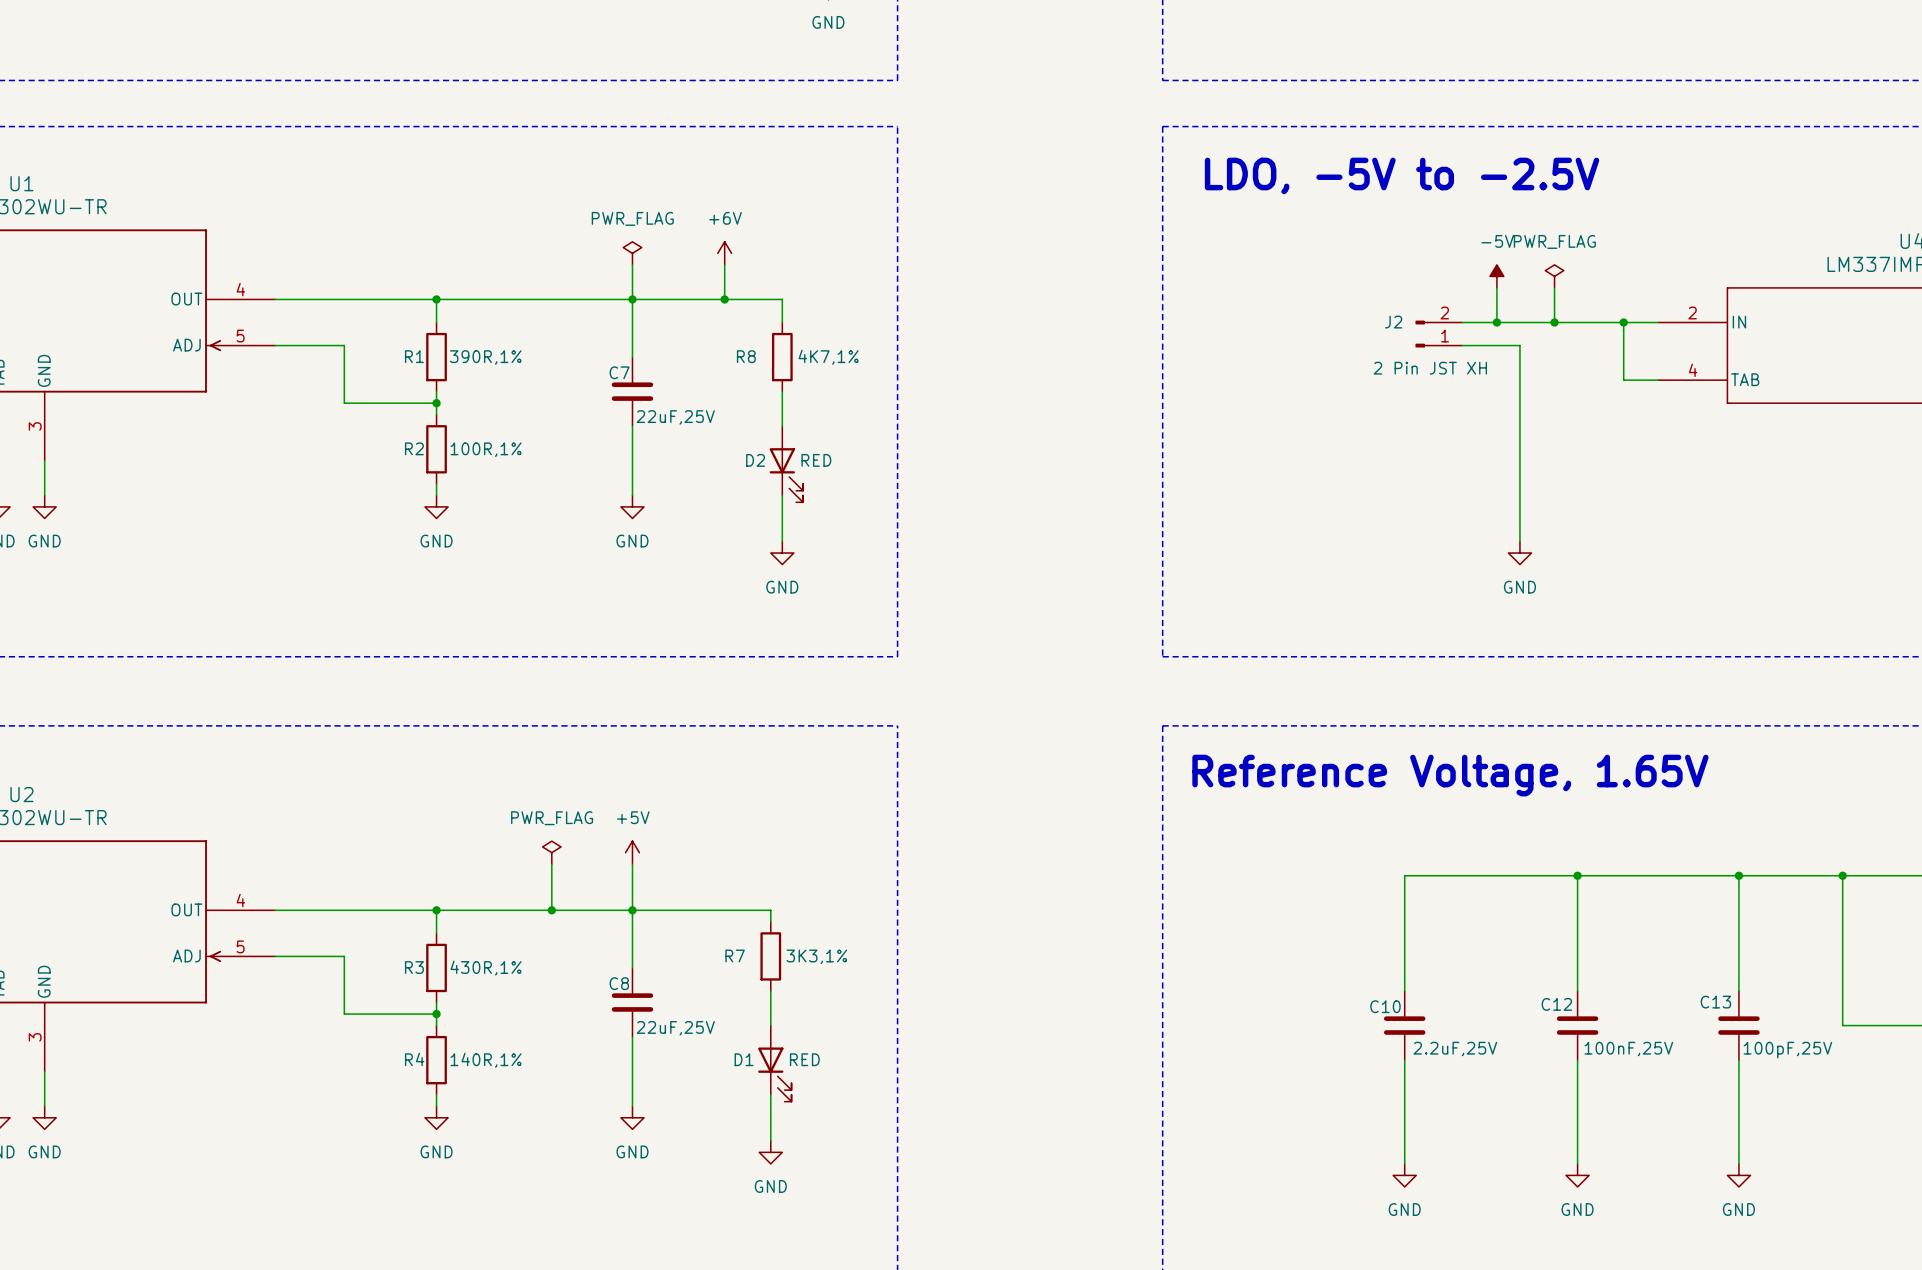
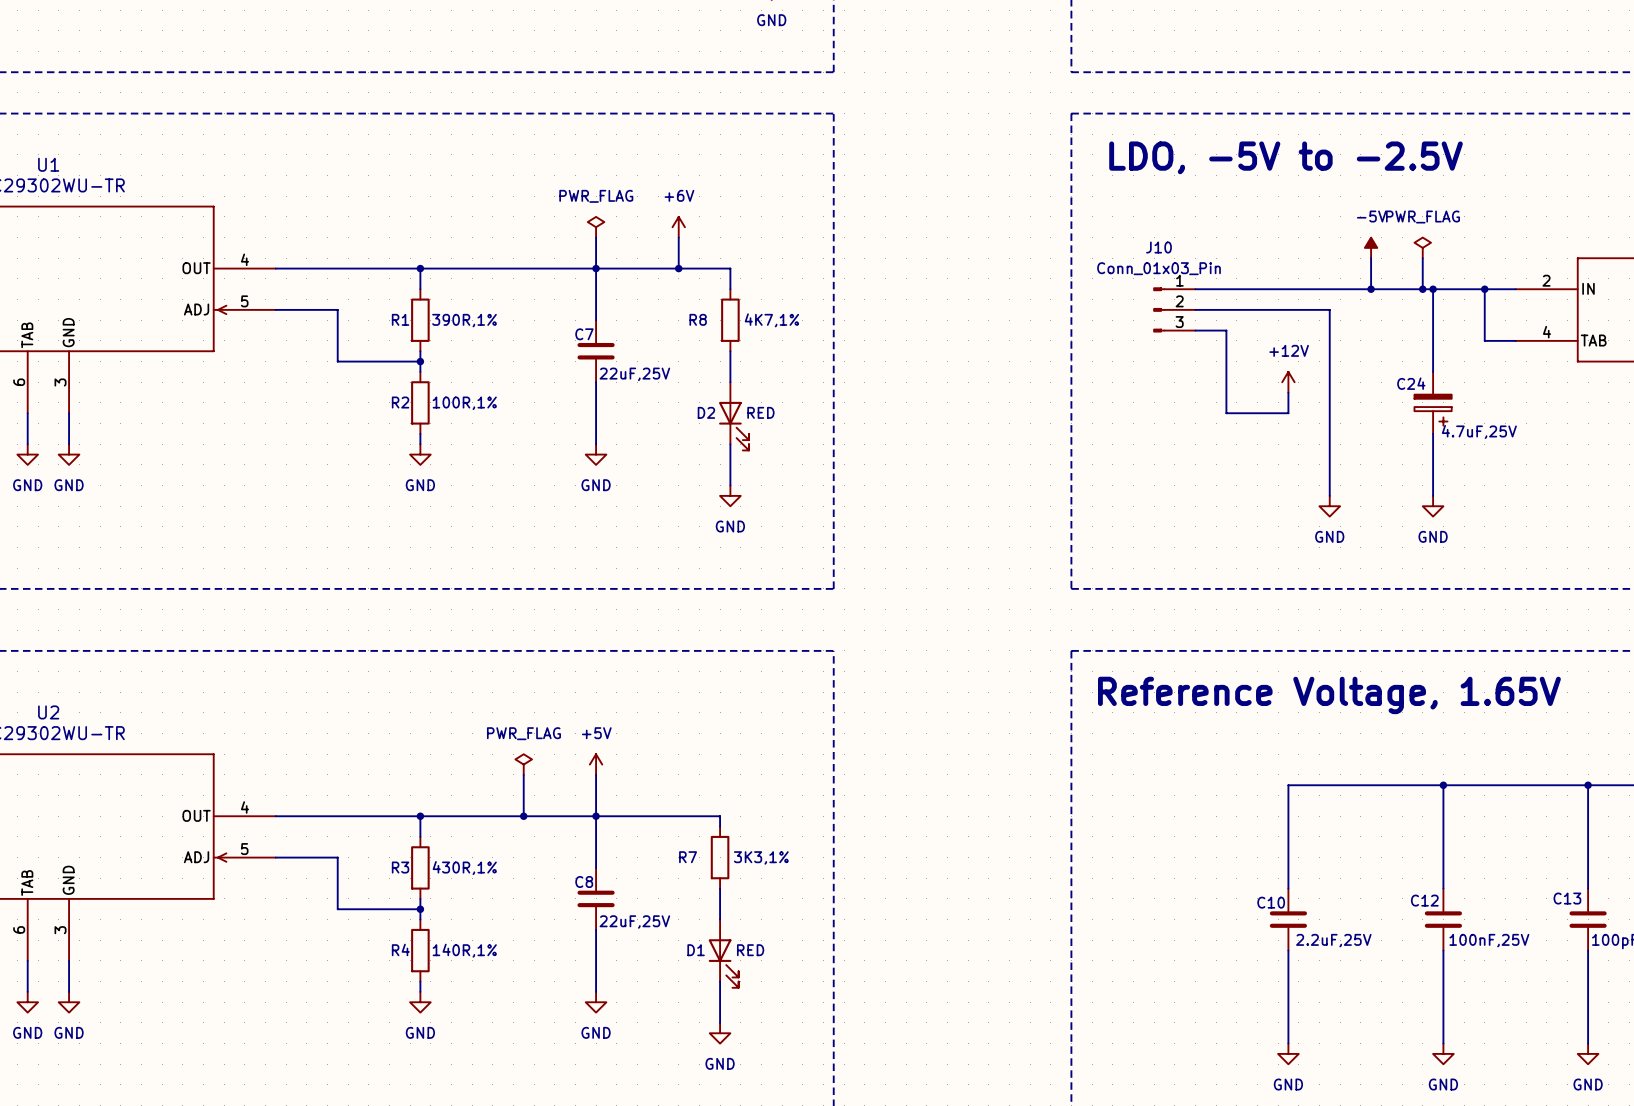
wire: none -> (1195, 289) (1340, 289)
wire: none -> (1433, 289) (1433, 371)
junction: none -> (1433, 289)
J2: 2 Pin JST XH (1438, 334) -> none
J10: none -> Conn_01x03_Pin (1174, 309)
wire: none -> (1195, 309) (1329, 309) (1329, 495)
wire: (1462, 345) (1519, 345) (1519, 541) -> none
wire: none -> (1195, 330) (1226, 330) (1226, 413) (1288, 413) (1288, 392)
power symbol: none -> +12V (1288, 382)
C24: none -> 4.7uF,25V (1433, 402)
wire: none -> (1433, 433) (1433, 495)
power symbol: GND (1519, 553) -> none
power symbol: none -> GND (1329, 506)
power symbol: none -> GND (1433, 506)

